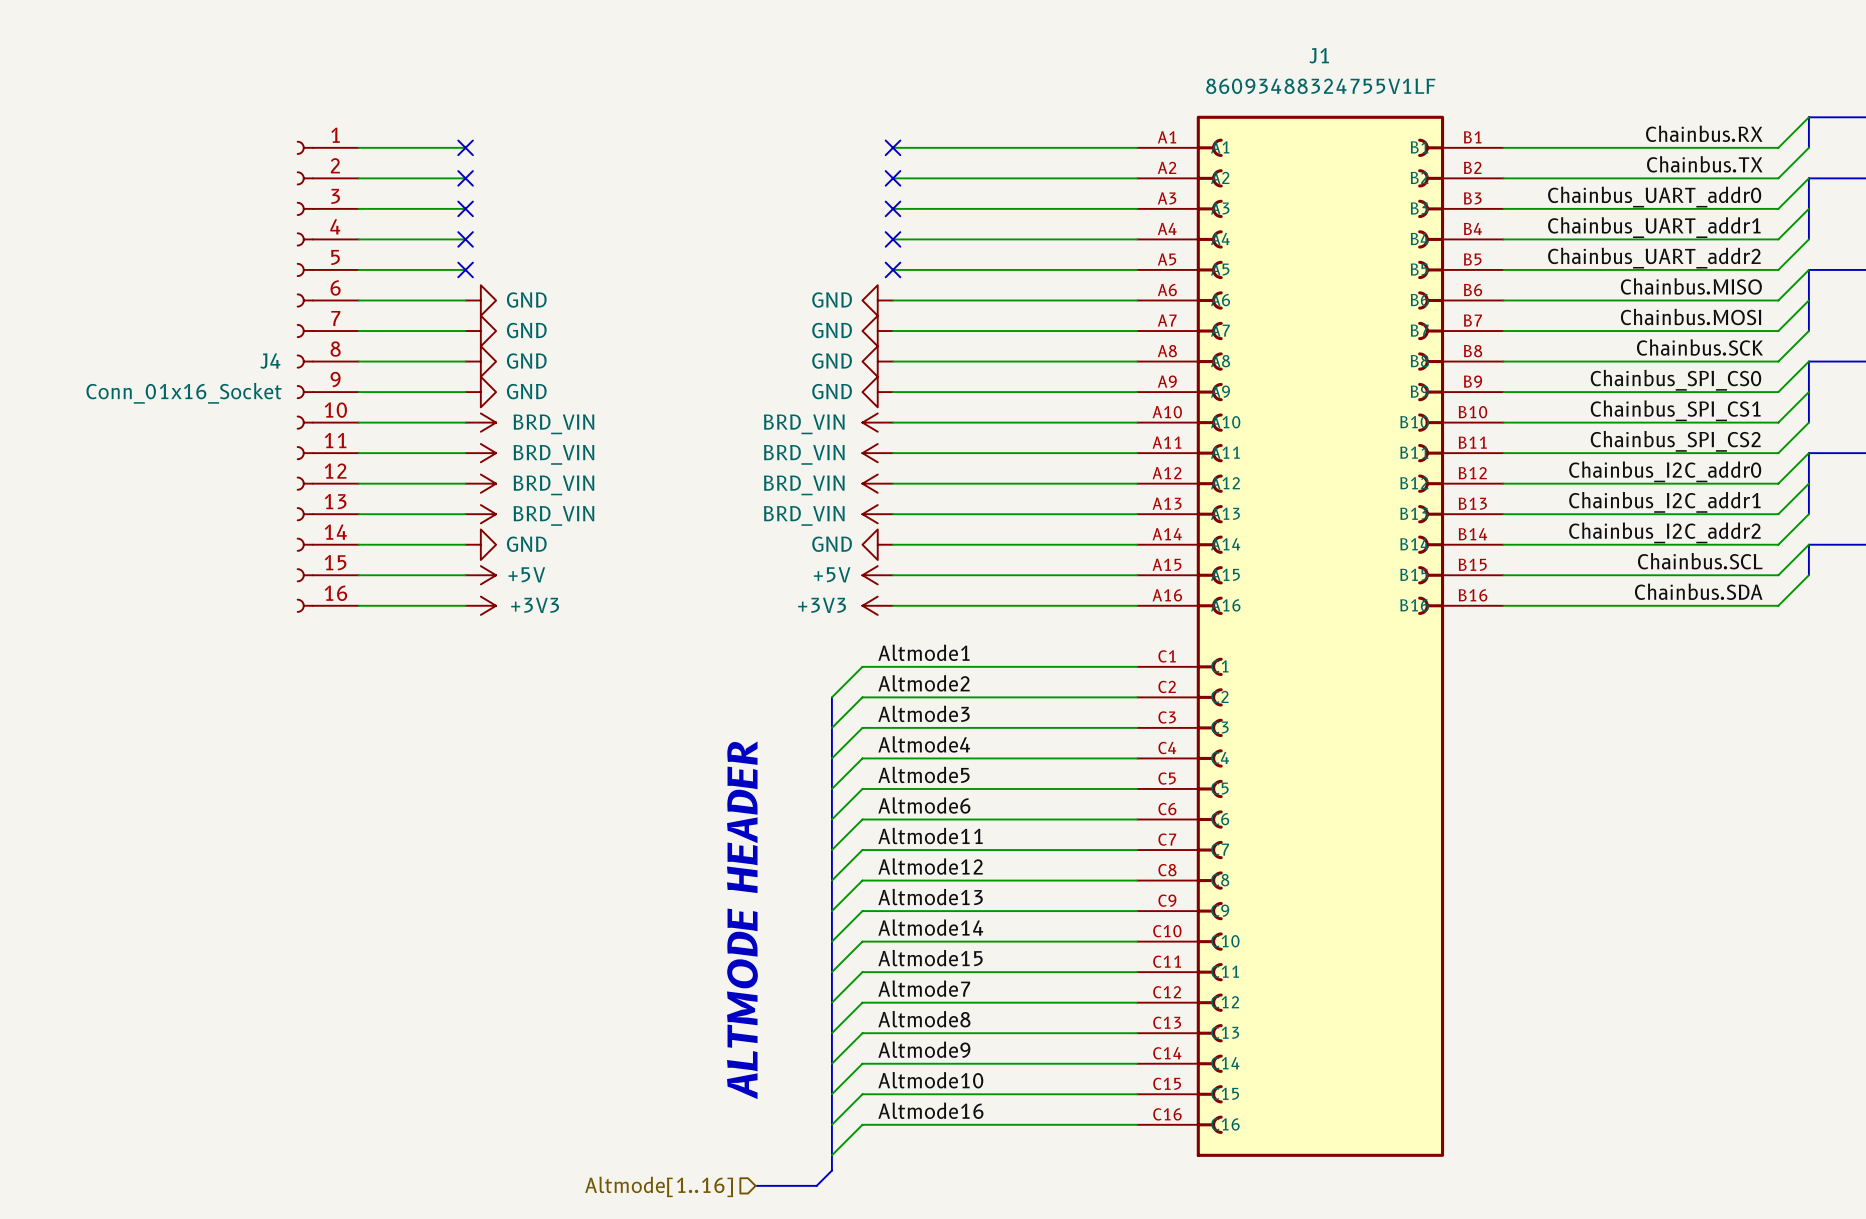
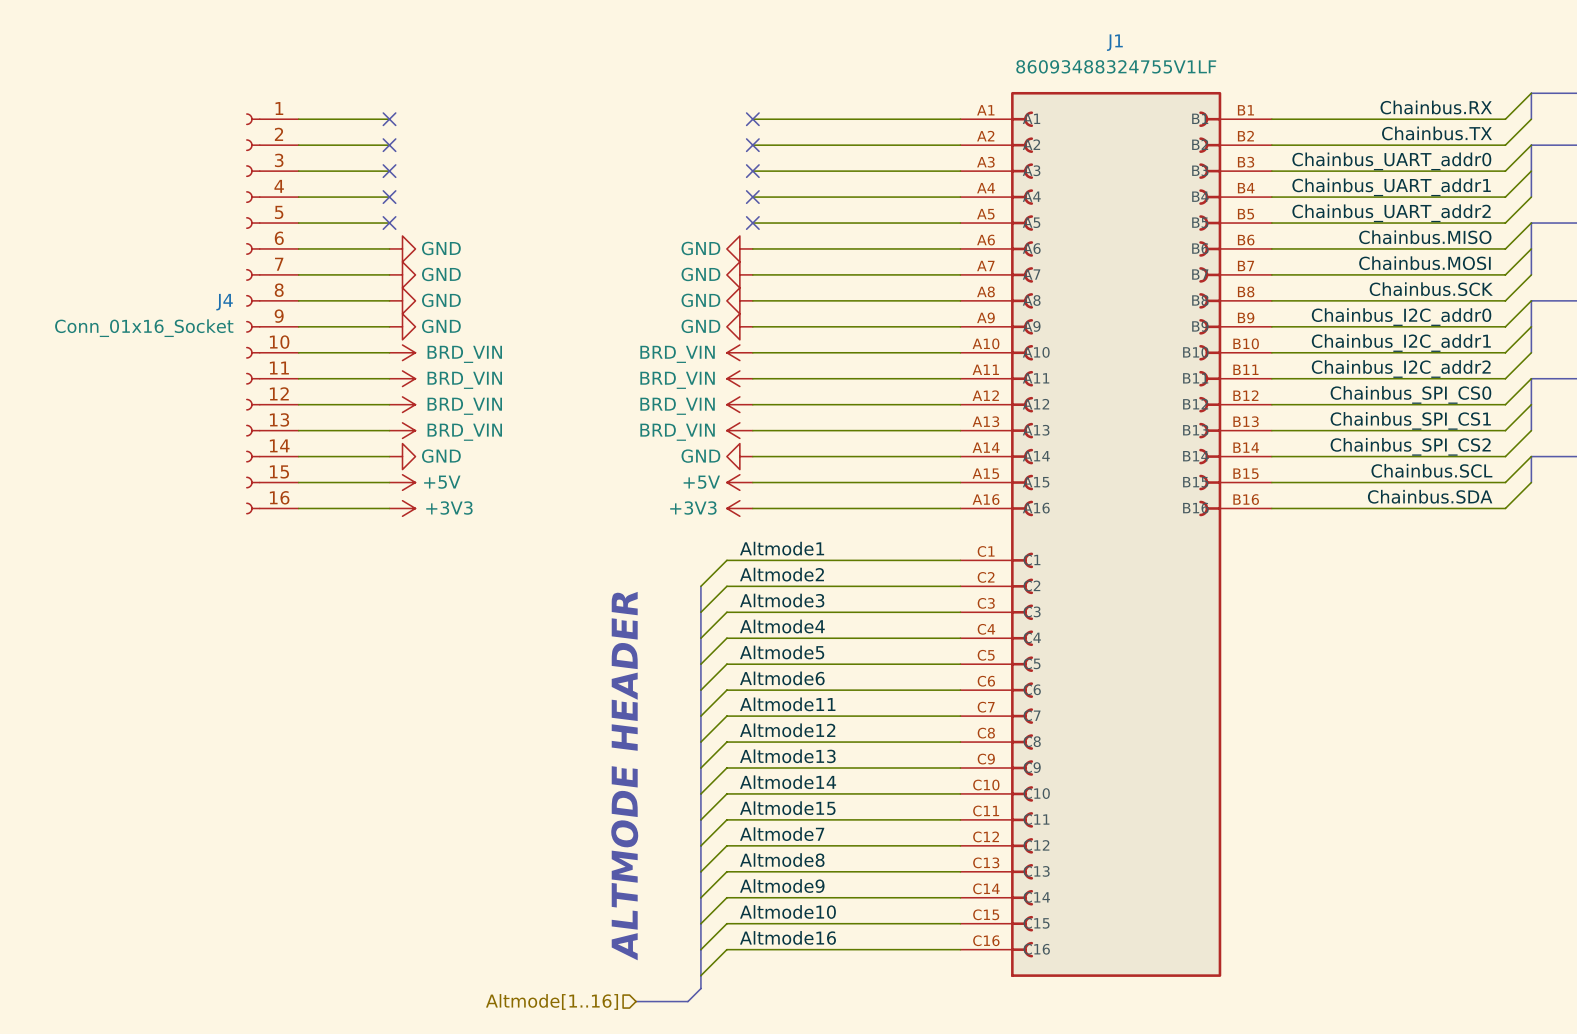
label: Chainbus_SPI_CS0 (1675, 380) -> Chainbus_I2C_addr0 (1401, 317)
label: Chainbus_SPI_CS1 (1675, 410) -> Chainbus_I2C_addr1 (1401, 343)
label: Chainbus_SPI_CS2 (1675, 441) -> Chainbus_I2C_addr2 (1401, 368)
label: Chainbus_I2C_addr0 (1665, 471) -> Chainbus_SPI_CS0 (1410, 394)
label: Chainbus_I2C_addr1 (1664, 502) -> Chainbus_SPI_CS1 (1410, 420)
label: Chainbus_I2C_addr2 (1664, 532) -> Chainbus_SPI_CS2 (1410, 446)

